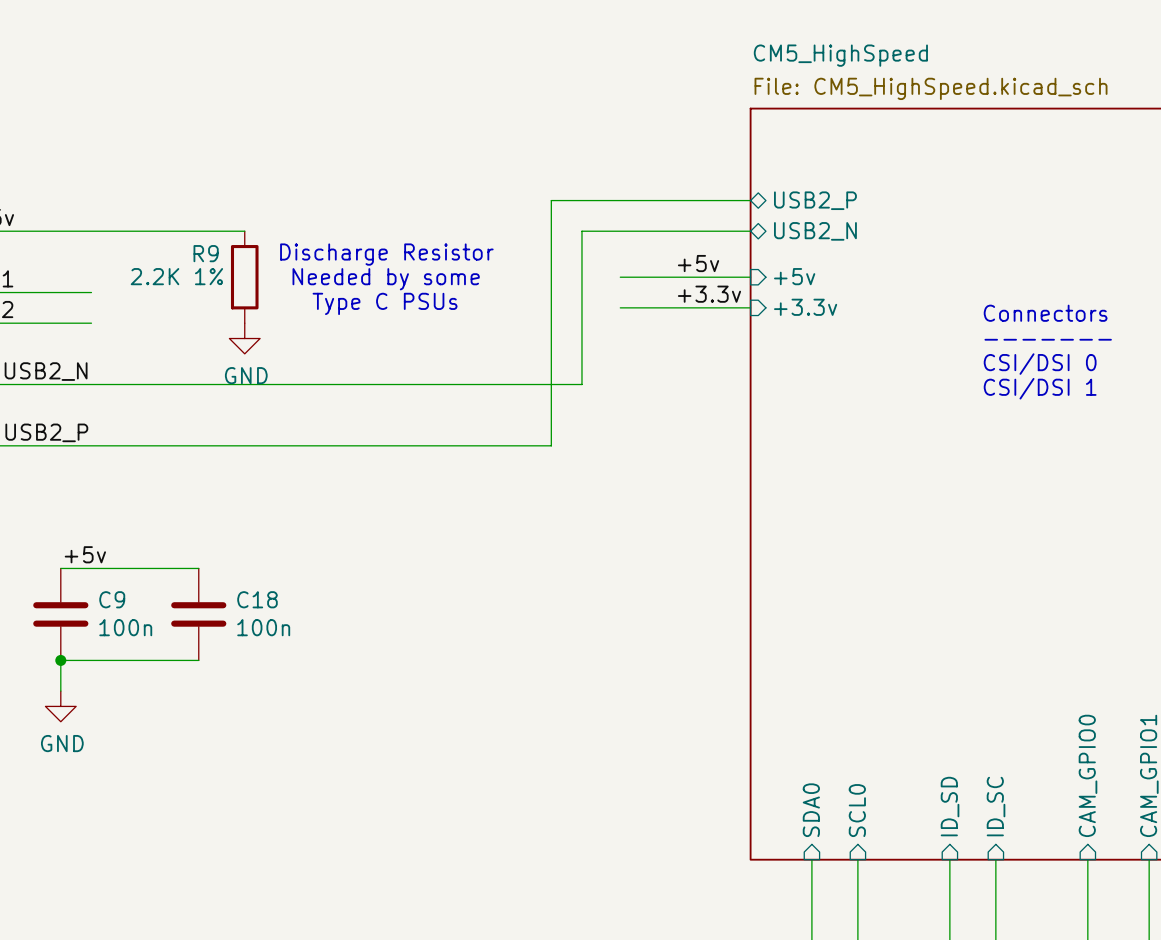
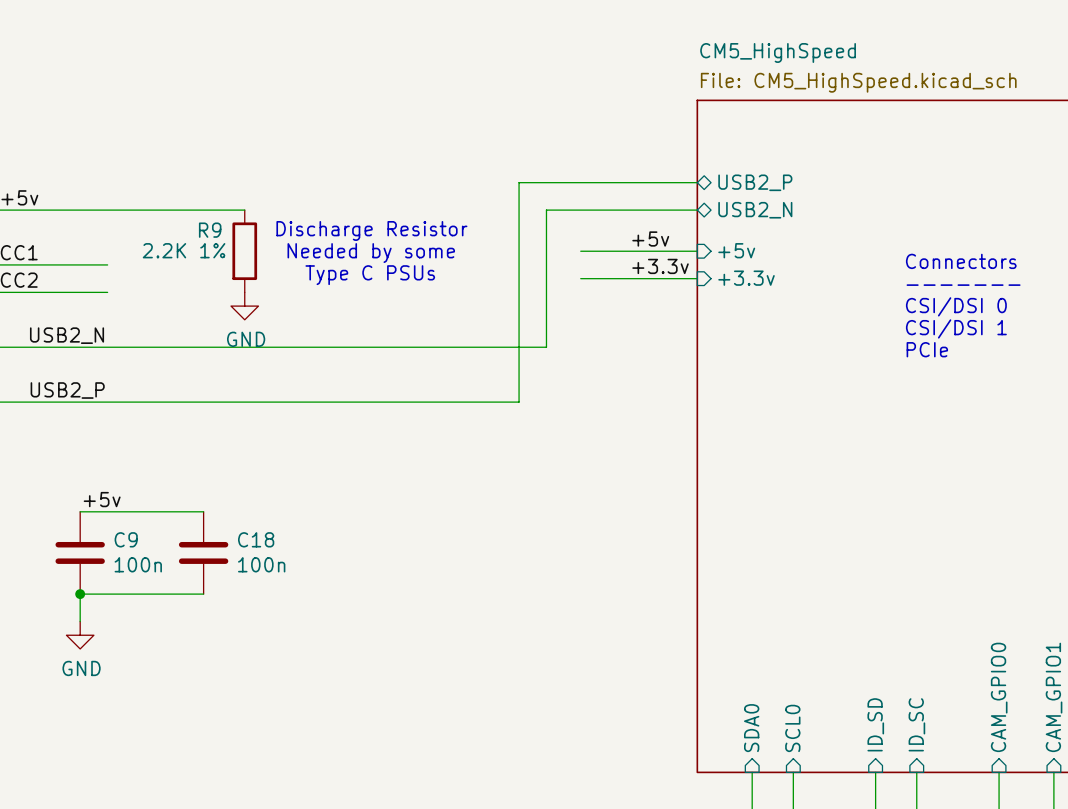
text: none -> Connectors (961, 261)
text: Connectors (1045, 313) -> ------- (963, 285)
text: ------- (1048, 339) -> CSI/DSI 0 (956, 306)
text: CSI/DSI 0 (1040, 364) -> CSI/DSI 1 (956, 328)
text: CSI/DSI 1 (1040, 388) -> PCIe (927, 349)

